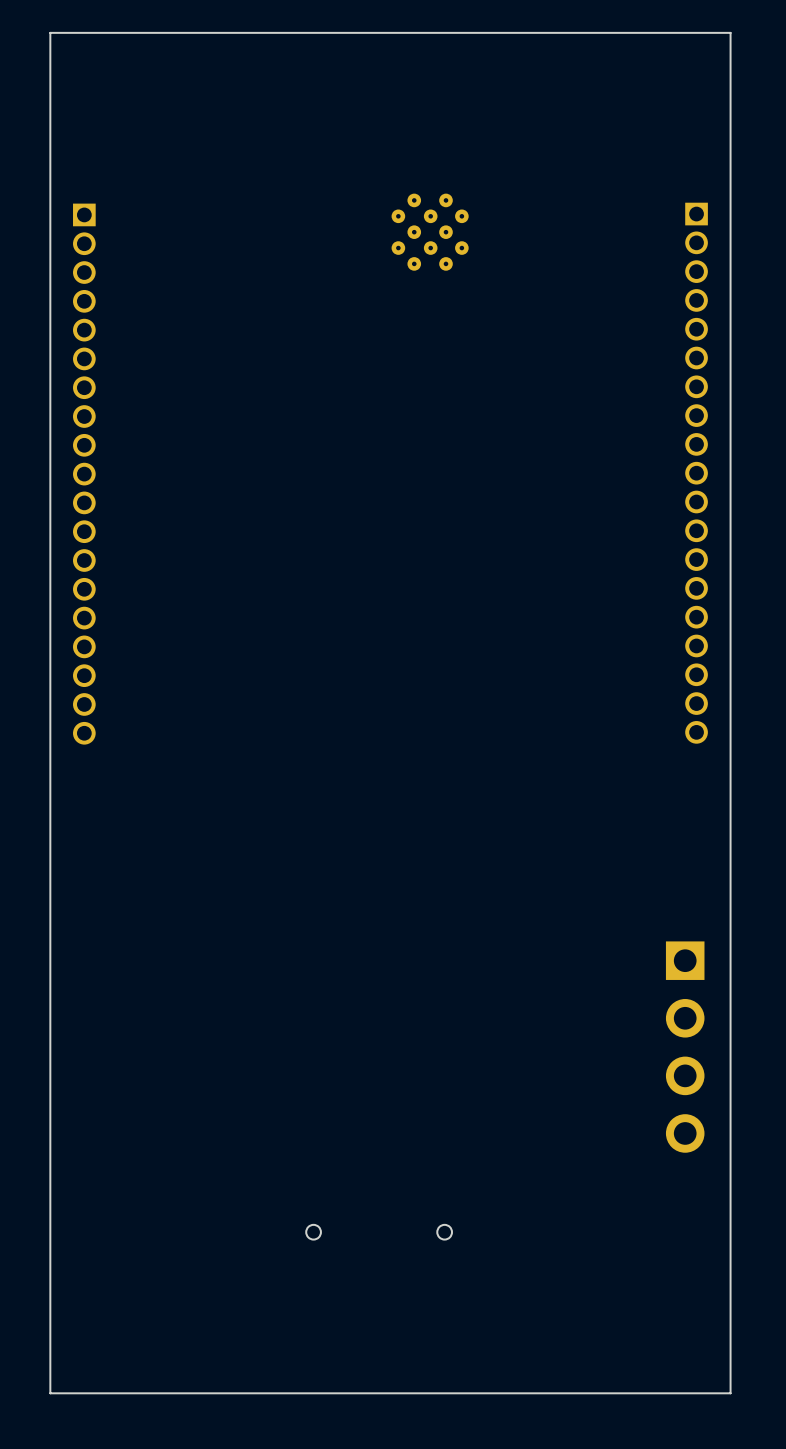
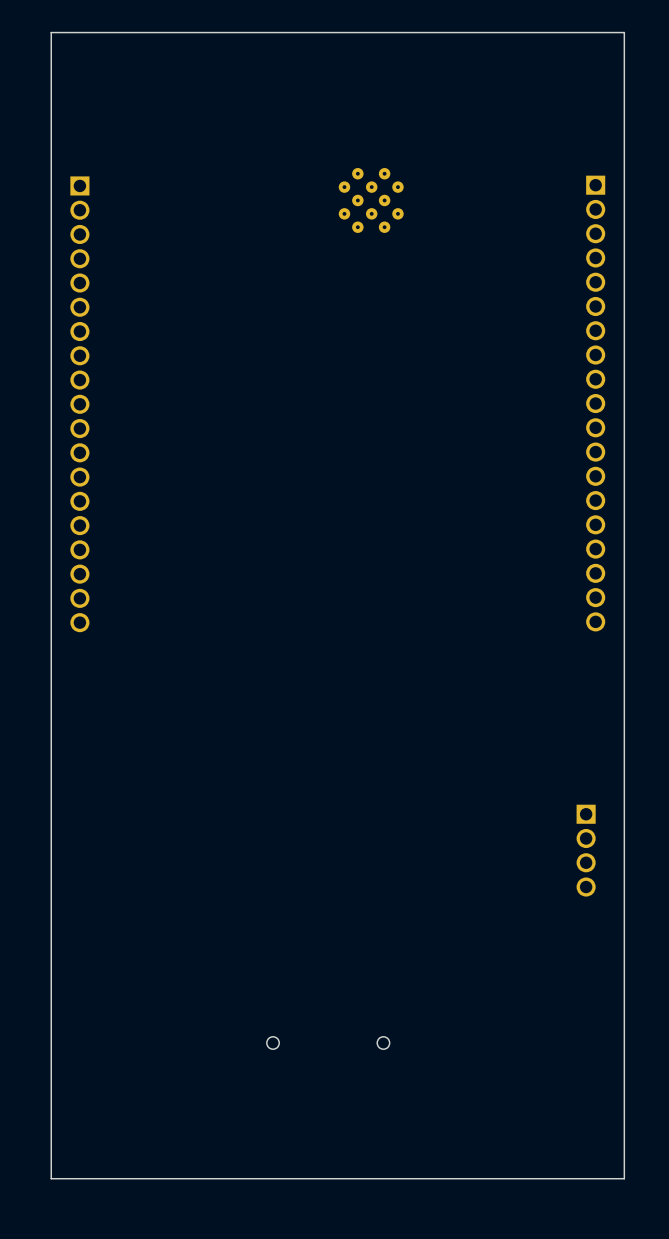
part: none -> (586, 850)
part: (685, 1047) -> none

